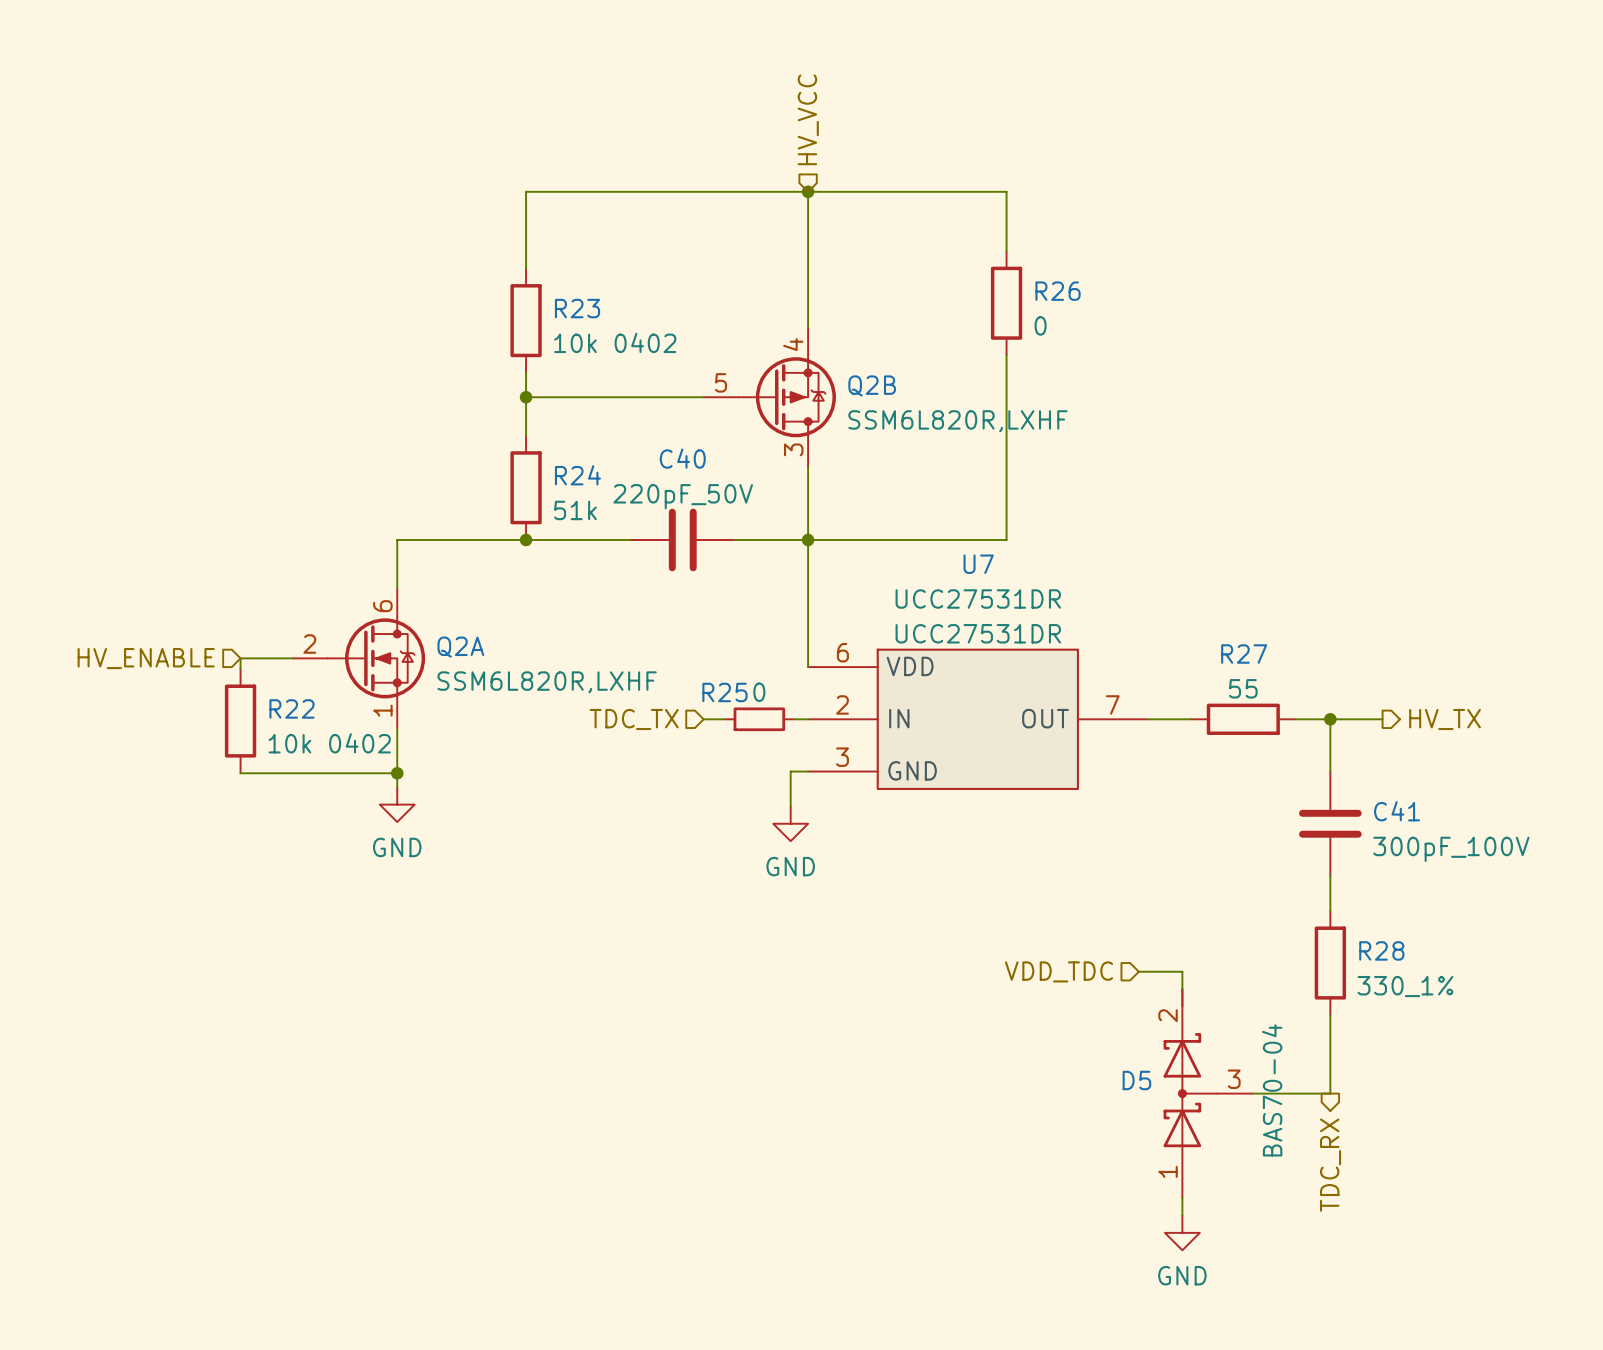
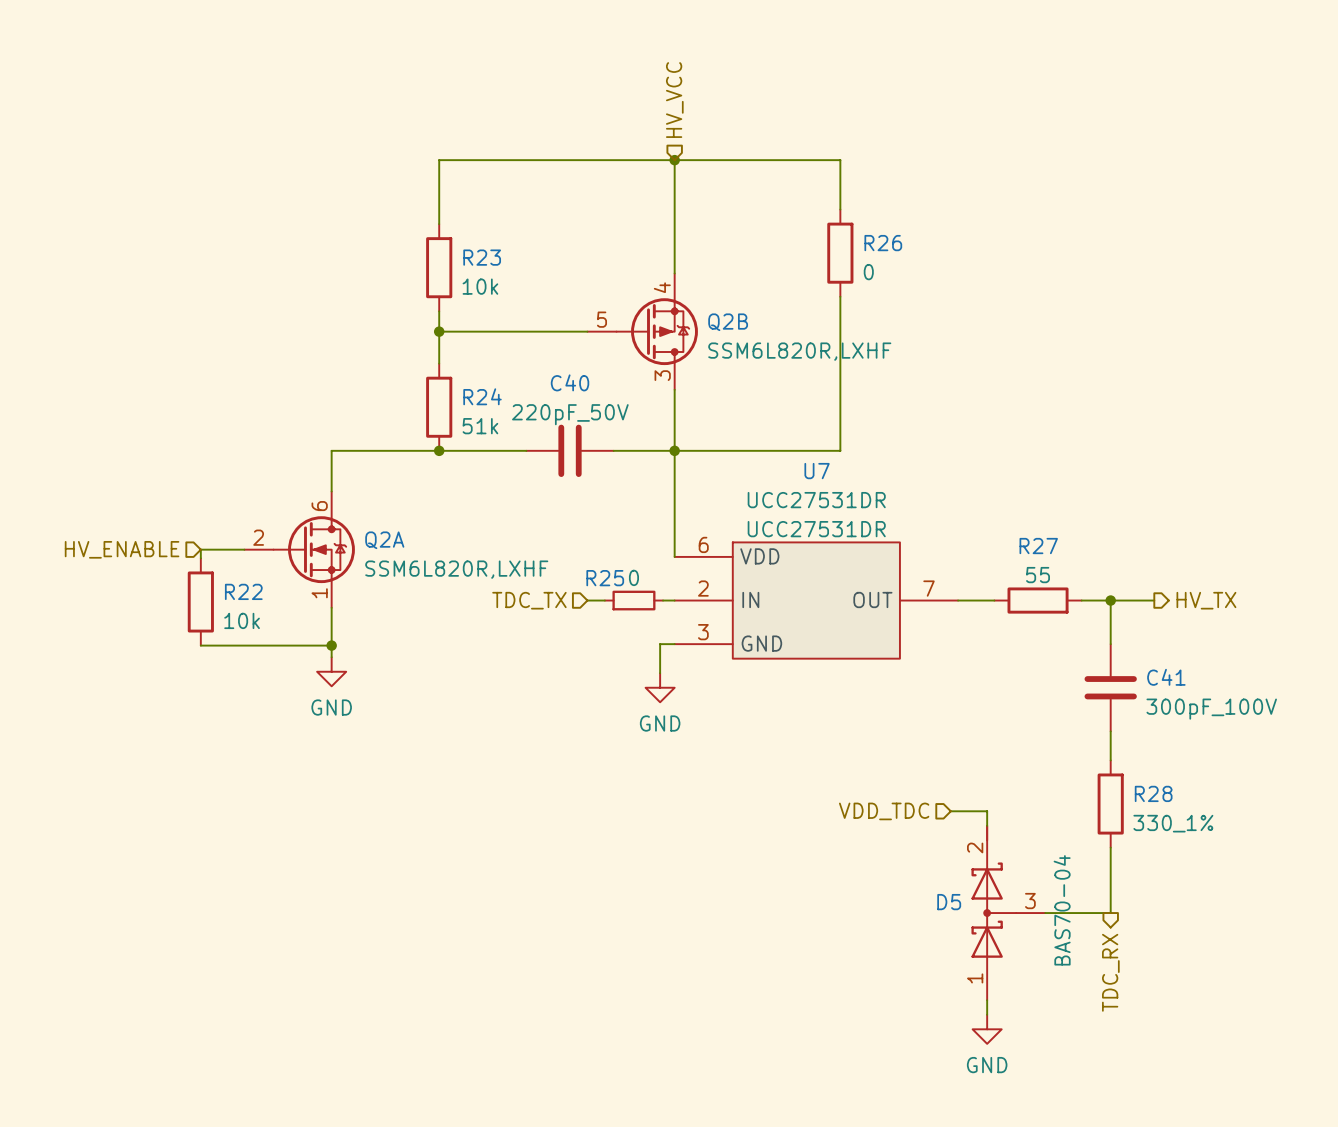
R23 value: 10k 0402 (615, 342) -> 10k (480, 286)
R22 value: 10k 0402 (329, 743) -> 10k (242, 620)

